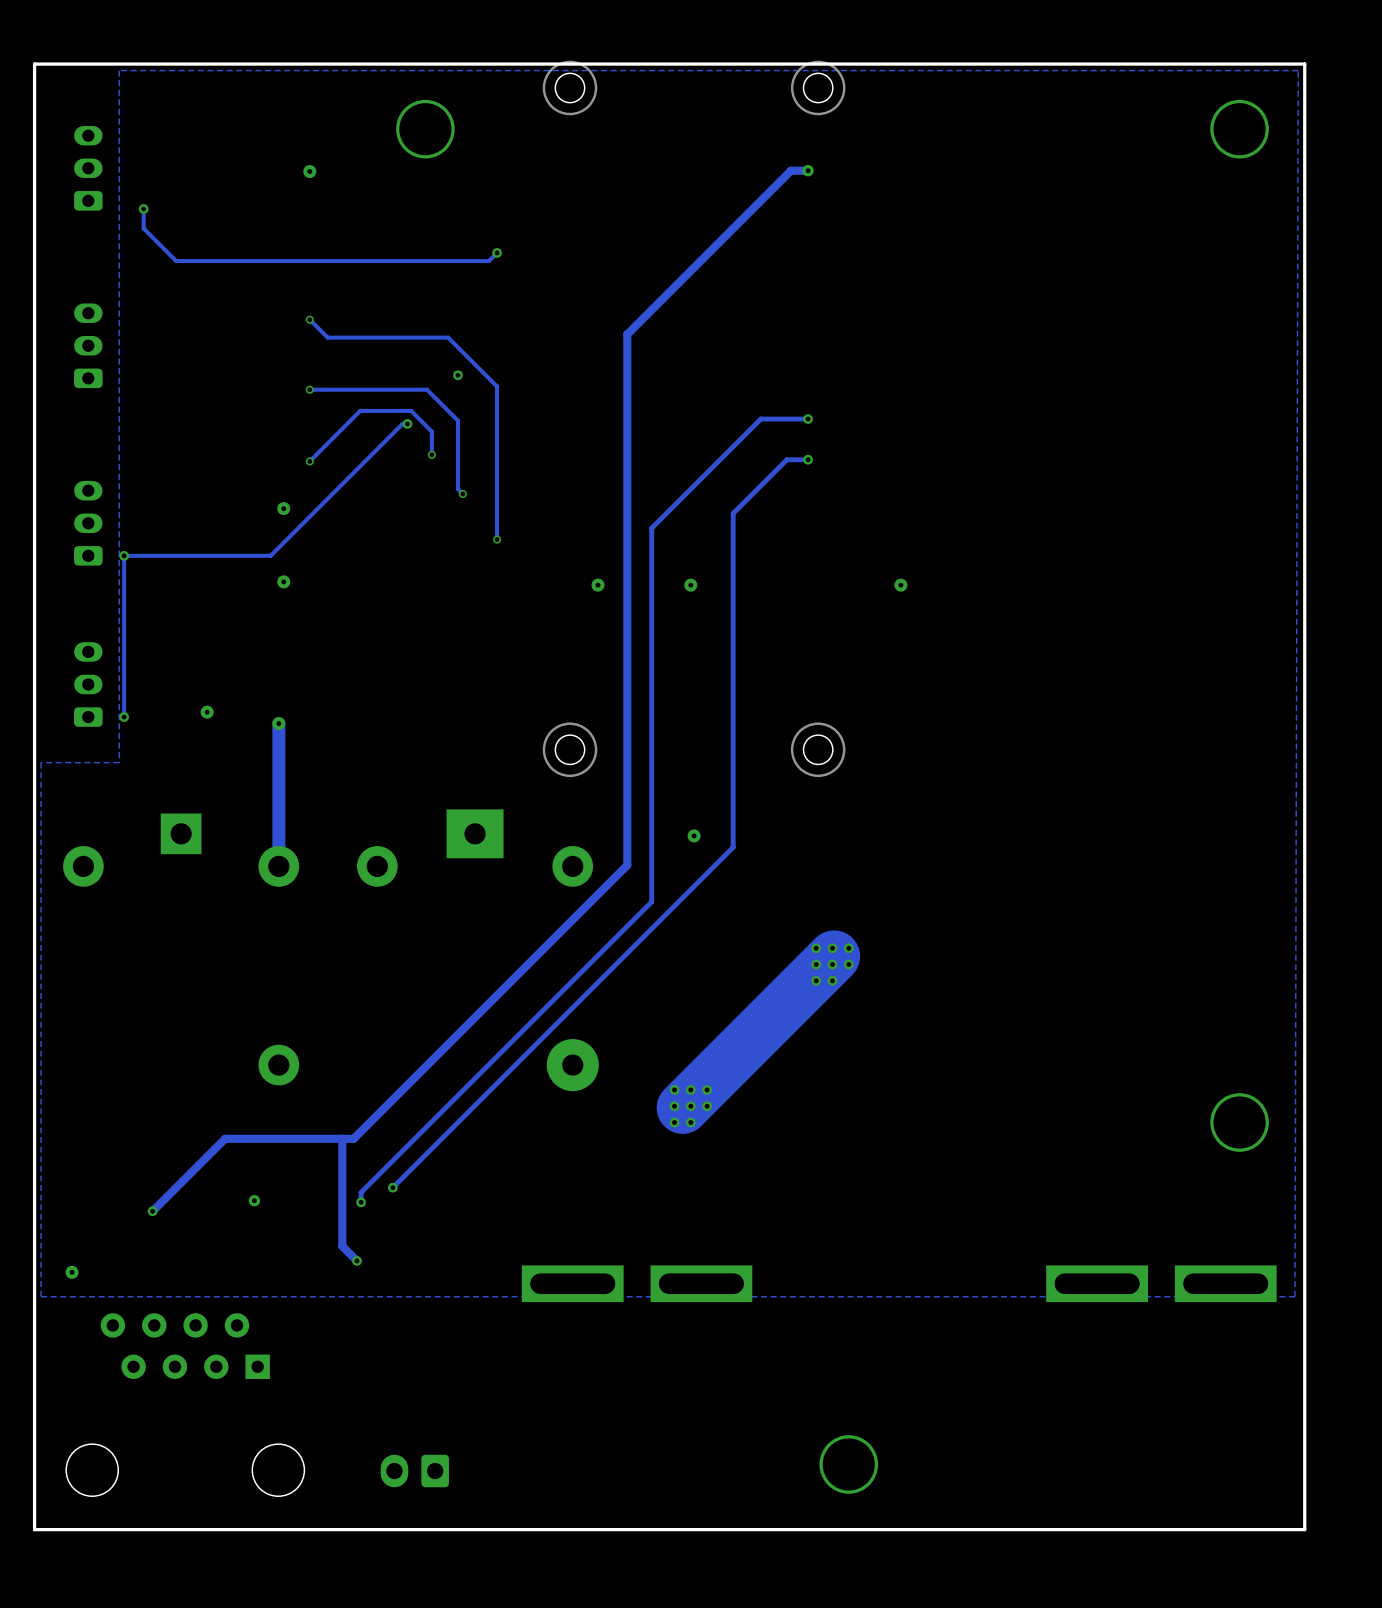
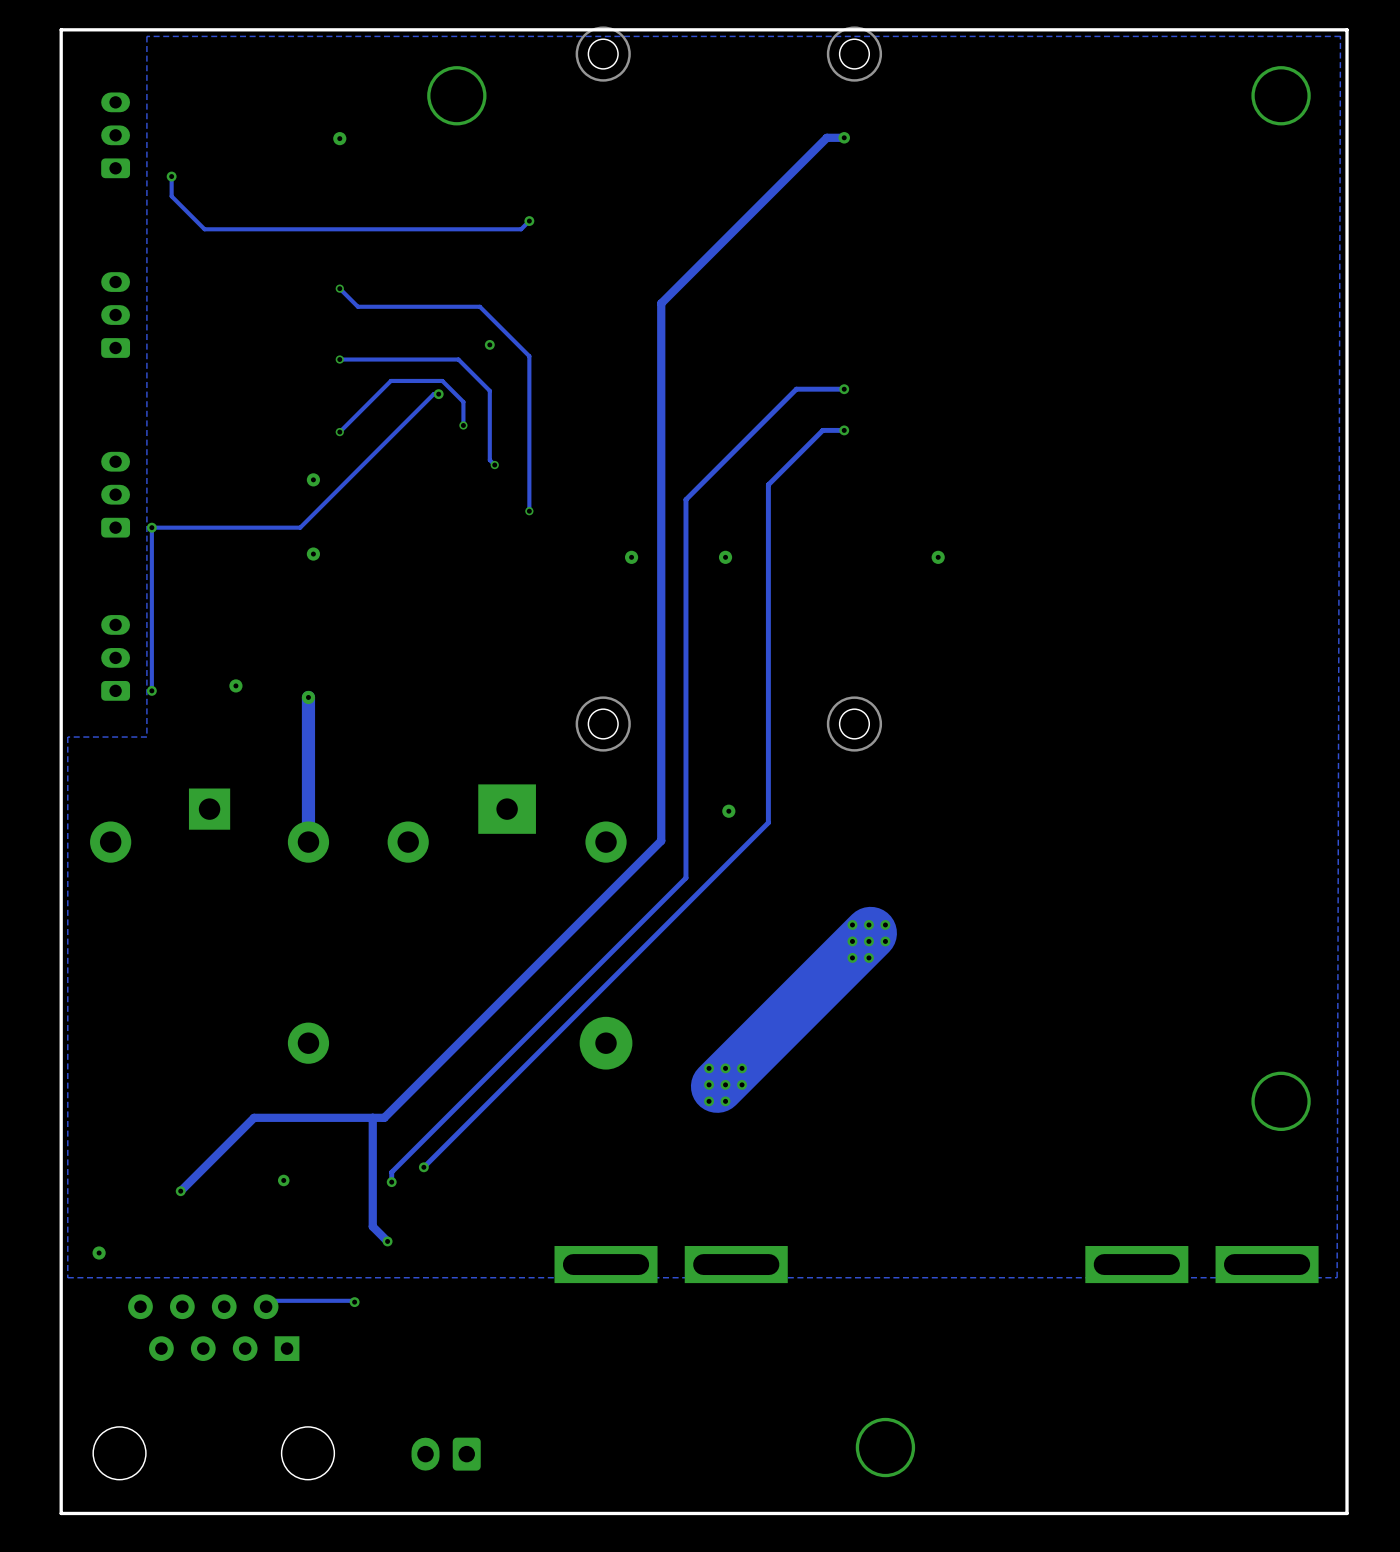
track: none -> (354, 1302) (272, 1300) (266, 1306)
via: none -> (354, 1302)

